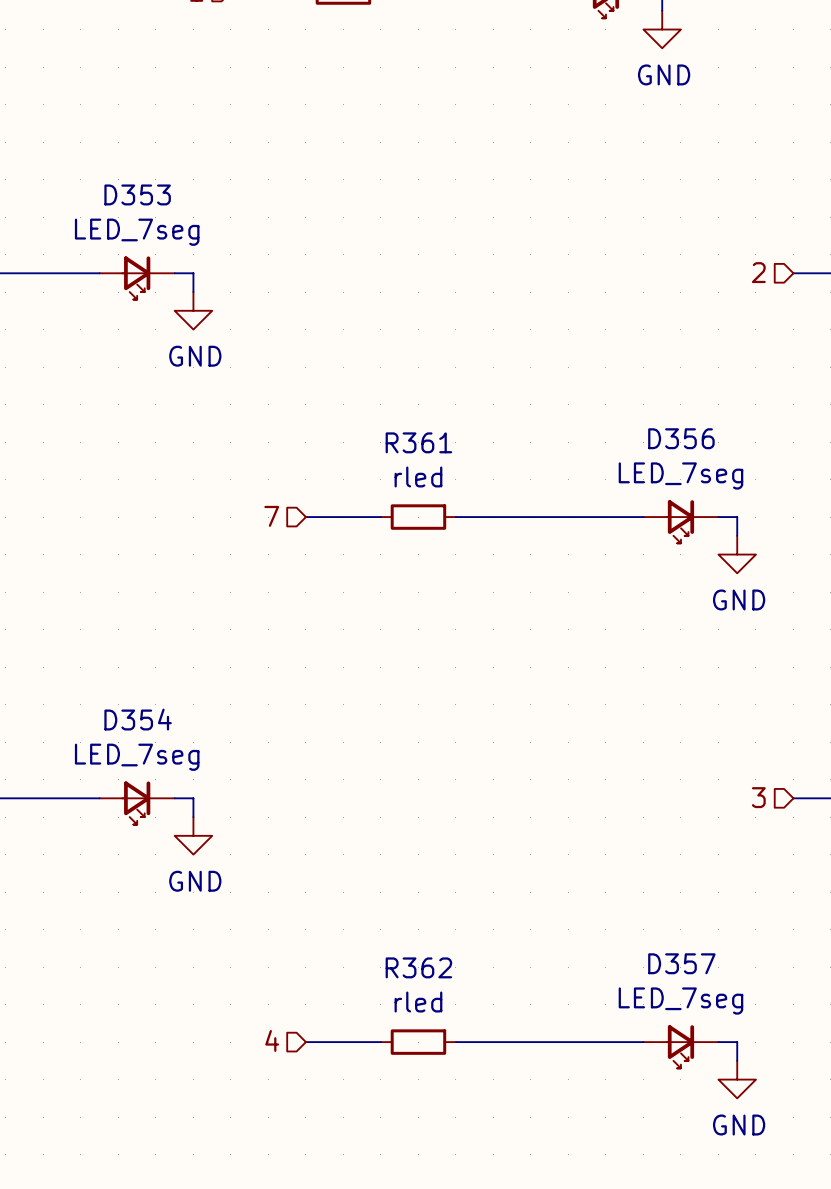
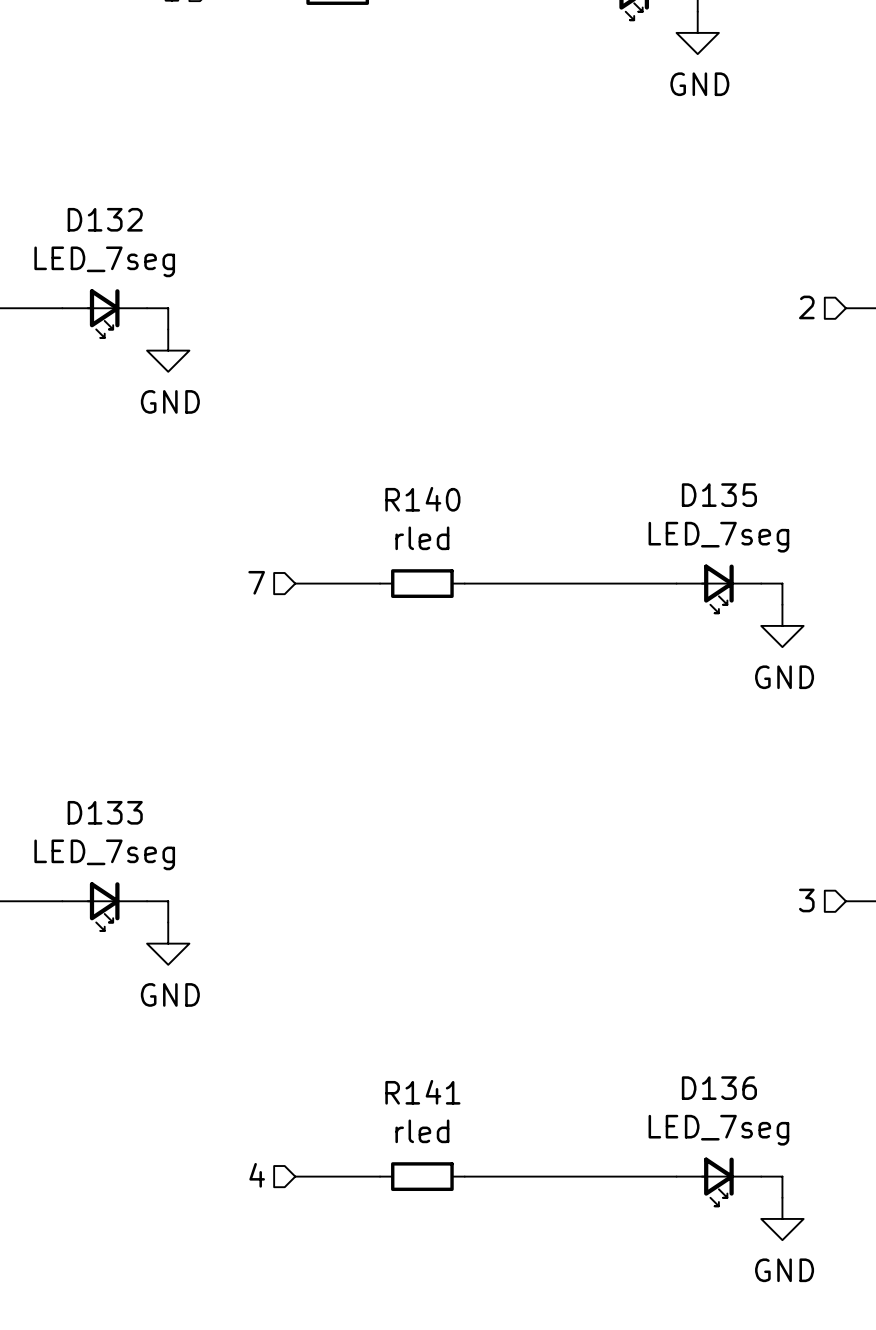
D353 name: D353 (137, 194) -> D132 (105, 219)
D356 name: D356 (681, 438) -> D135 (719, 495)
R361 name: R361 (418, 442) -> R140 (422, 499)
D354 name: D354 (138, 719) -> D133 (105, 812)
D357 name: D357 (681, 963) -> D136 (719, 1088)
R362 name: R362 (418, 967) -> R141 (422, 1092)

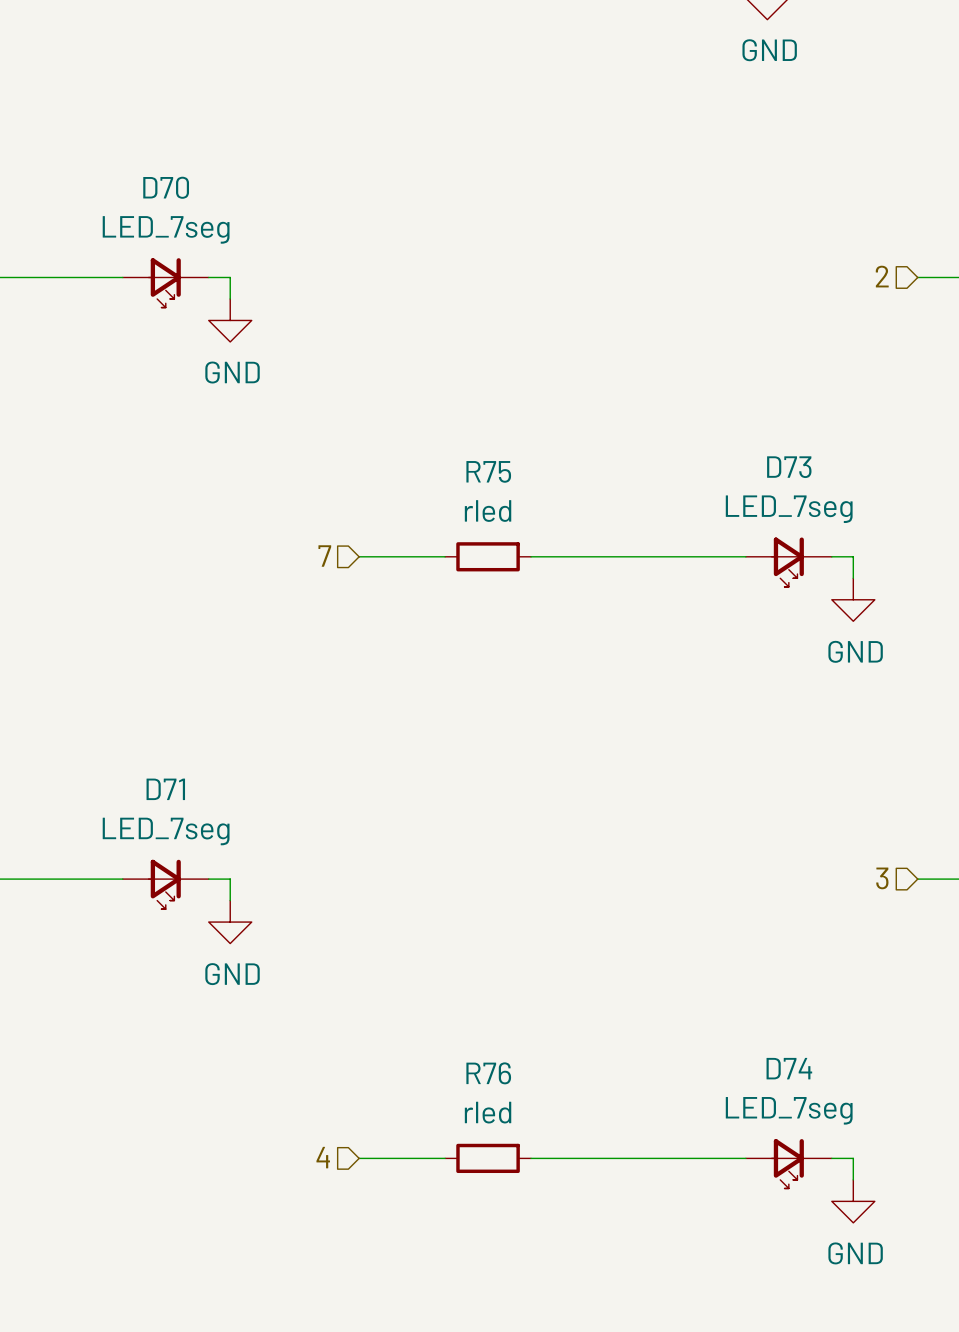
D132 name: D132 (105, 219) -> D70 (166, 187)
D135 name: D135 (719, 495) -> D73 (789, 467)
R140 name: R140 (422, 499) -> R75 (488, 471)
D133 name: D133 (105, 812) -> D71 (165, 789)
D136 name: D136 (719, 1088) -> D74 (789, 1068)
R141 name: R141 (422, 1092) -> R76 (488, 1073)

